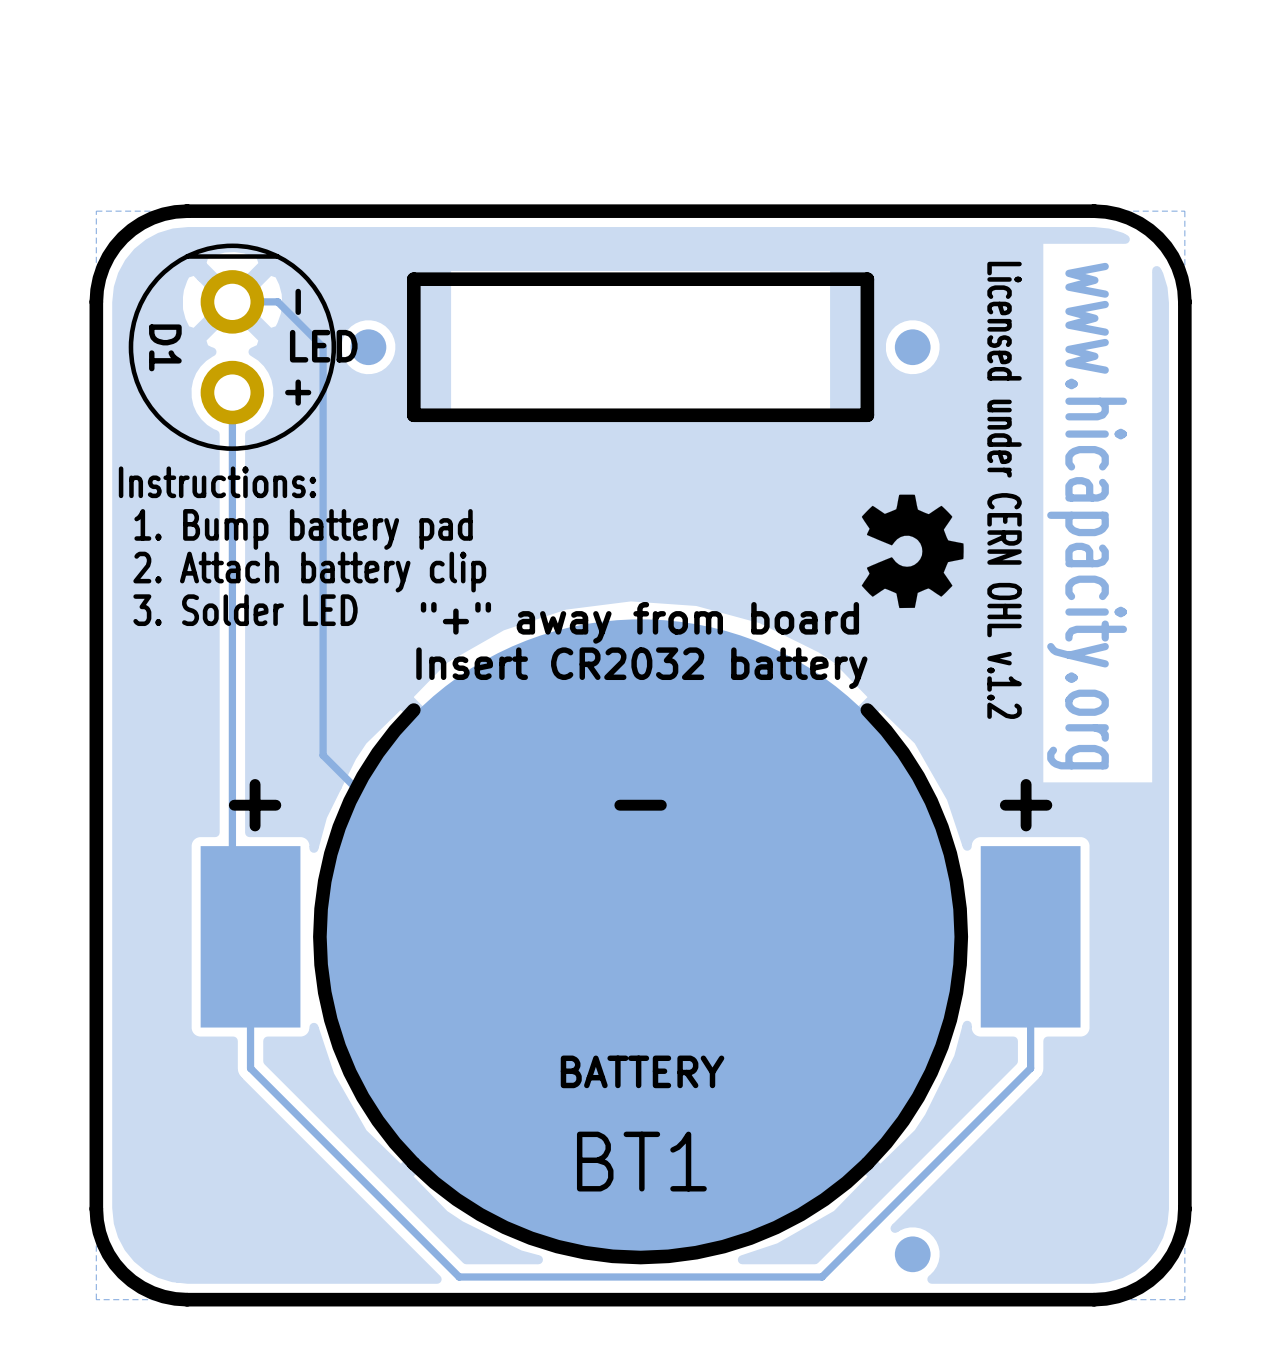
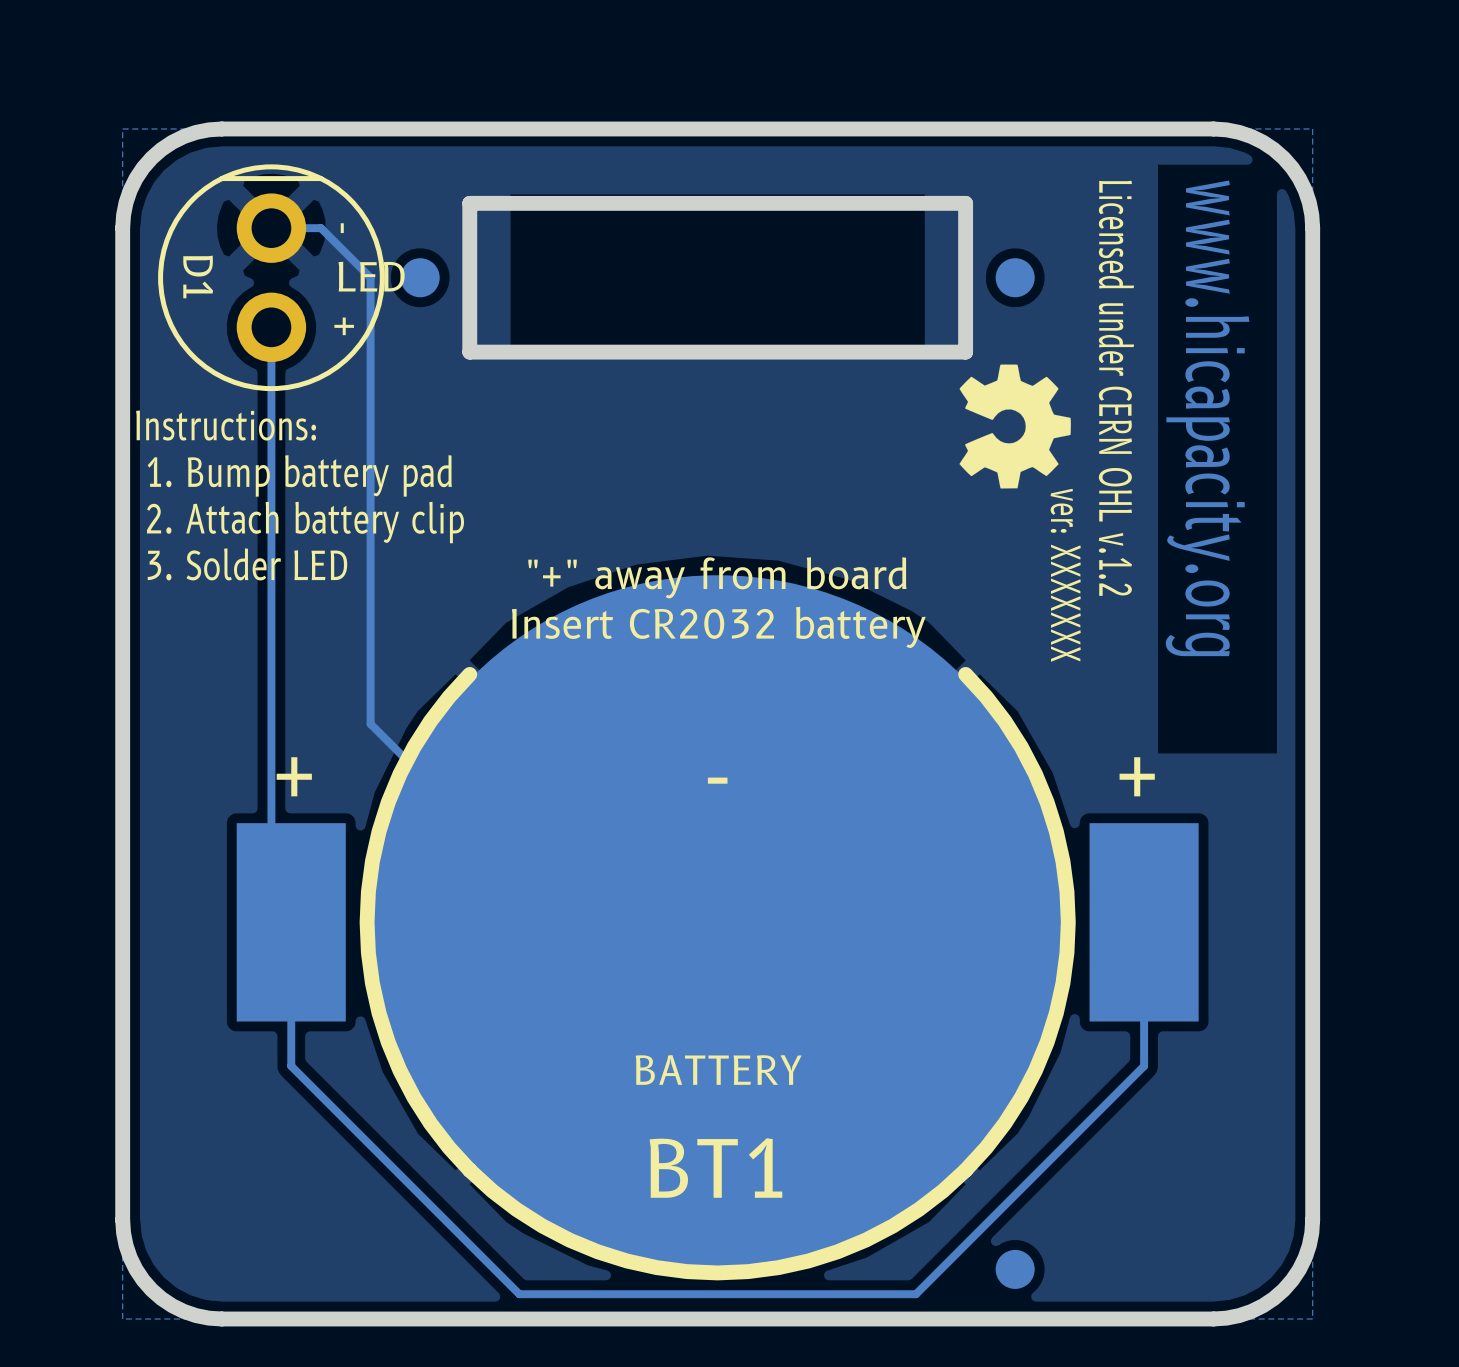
drawing position: (912, 551) -> (1015, 426)
text: none -> ver: XXXXXXX (1065, 575)

